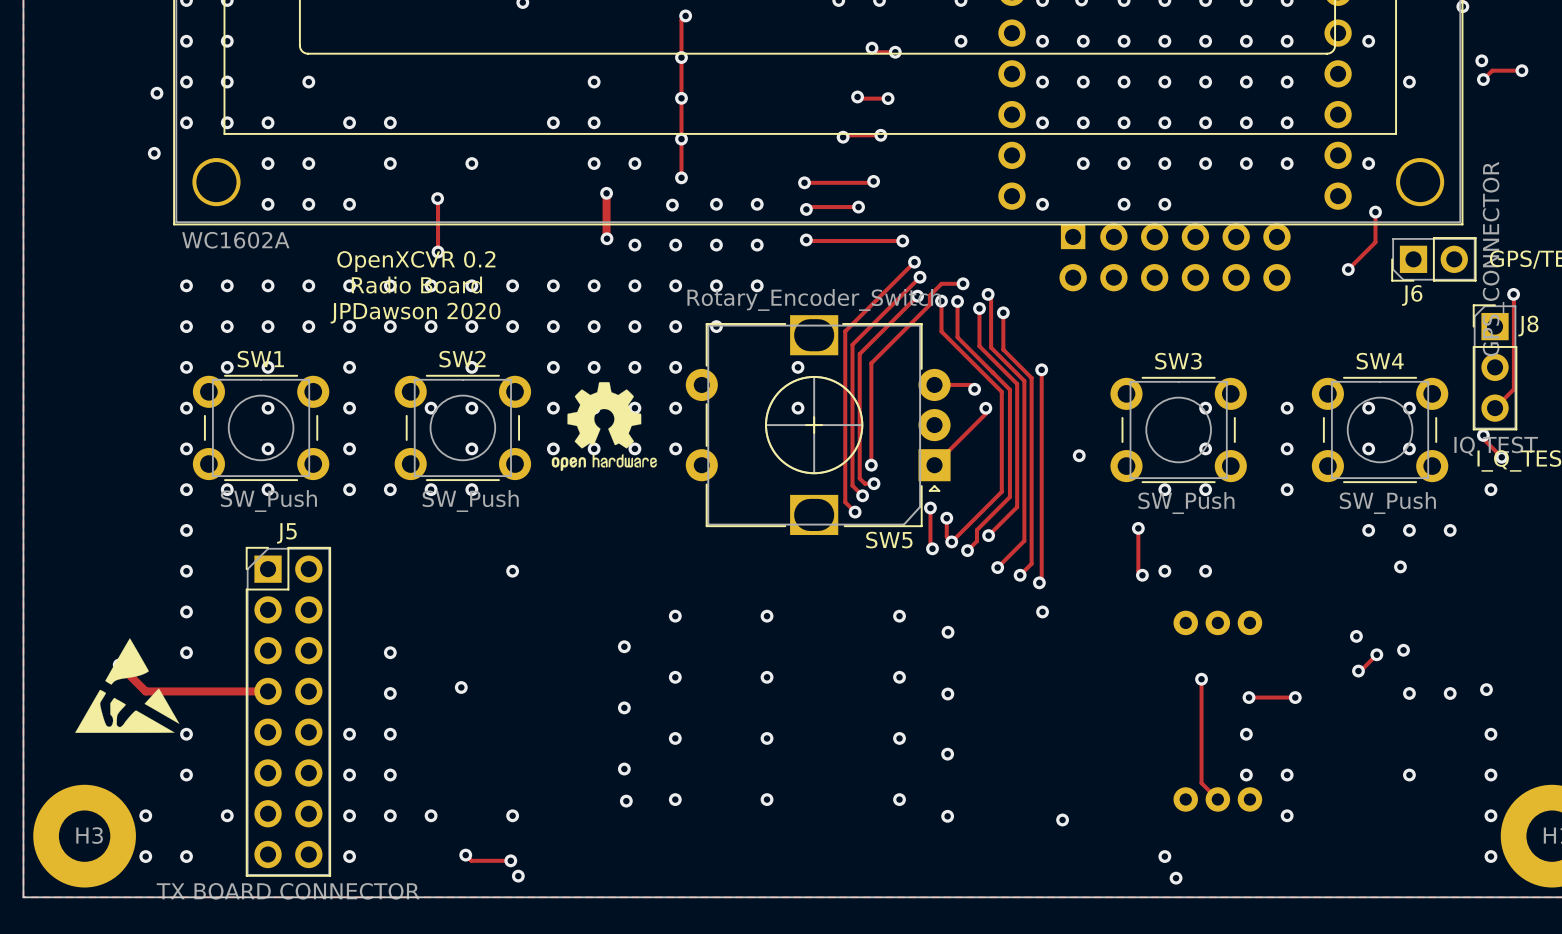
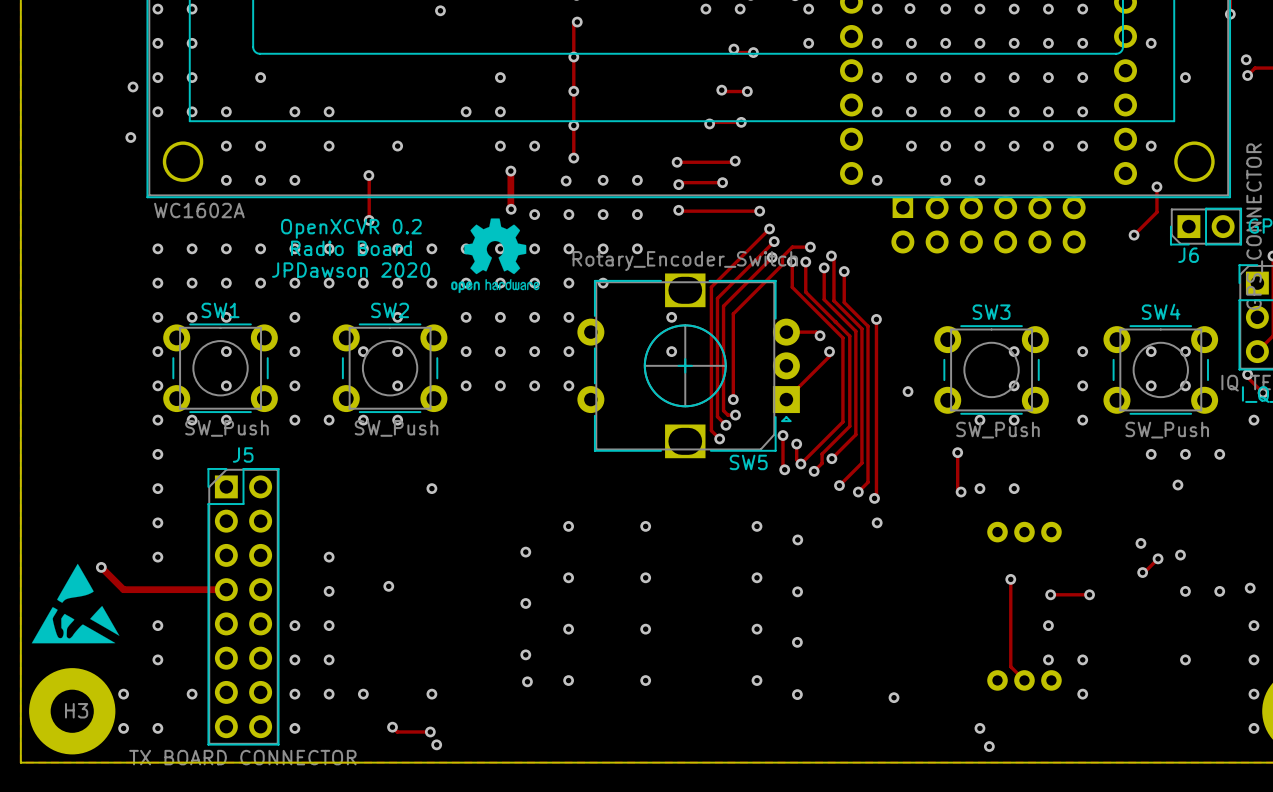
drawing position: (604, 426) -> (495, 255)
drawing position: (127, 685) -> (75, 603)

